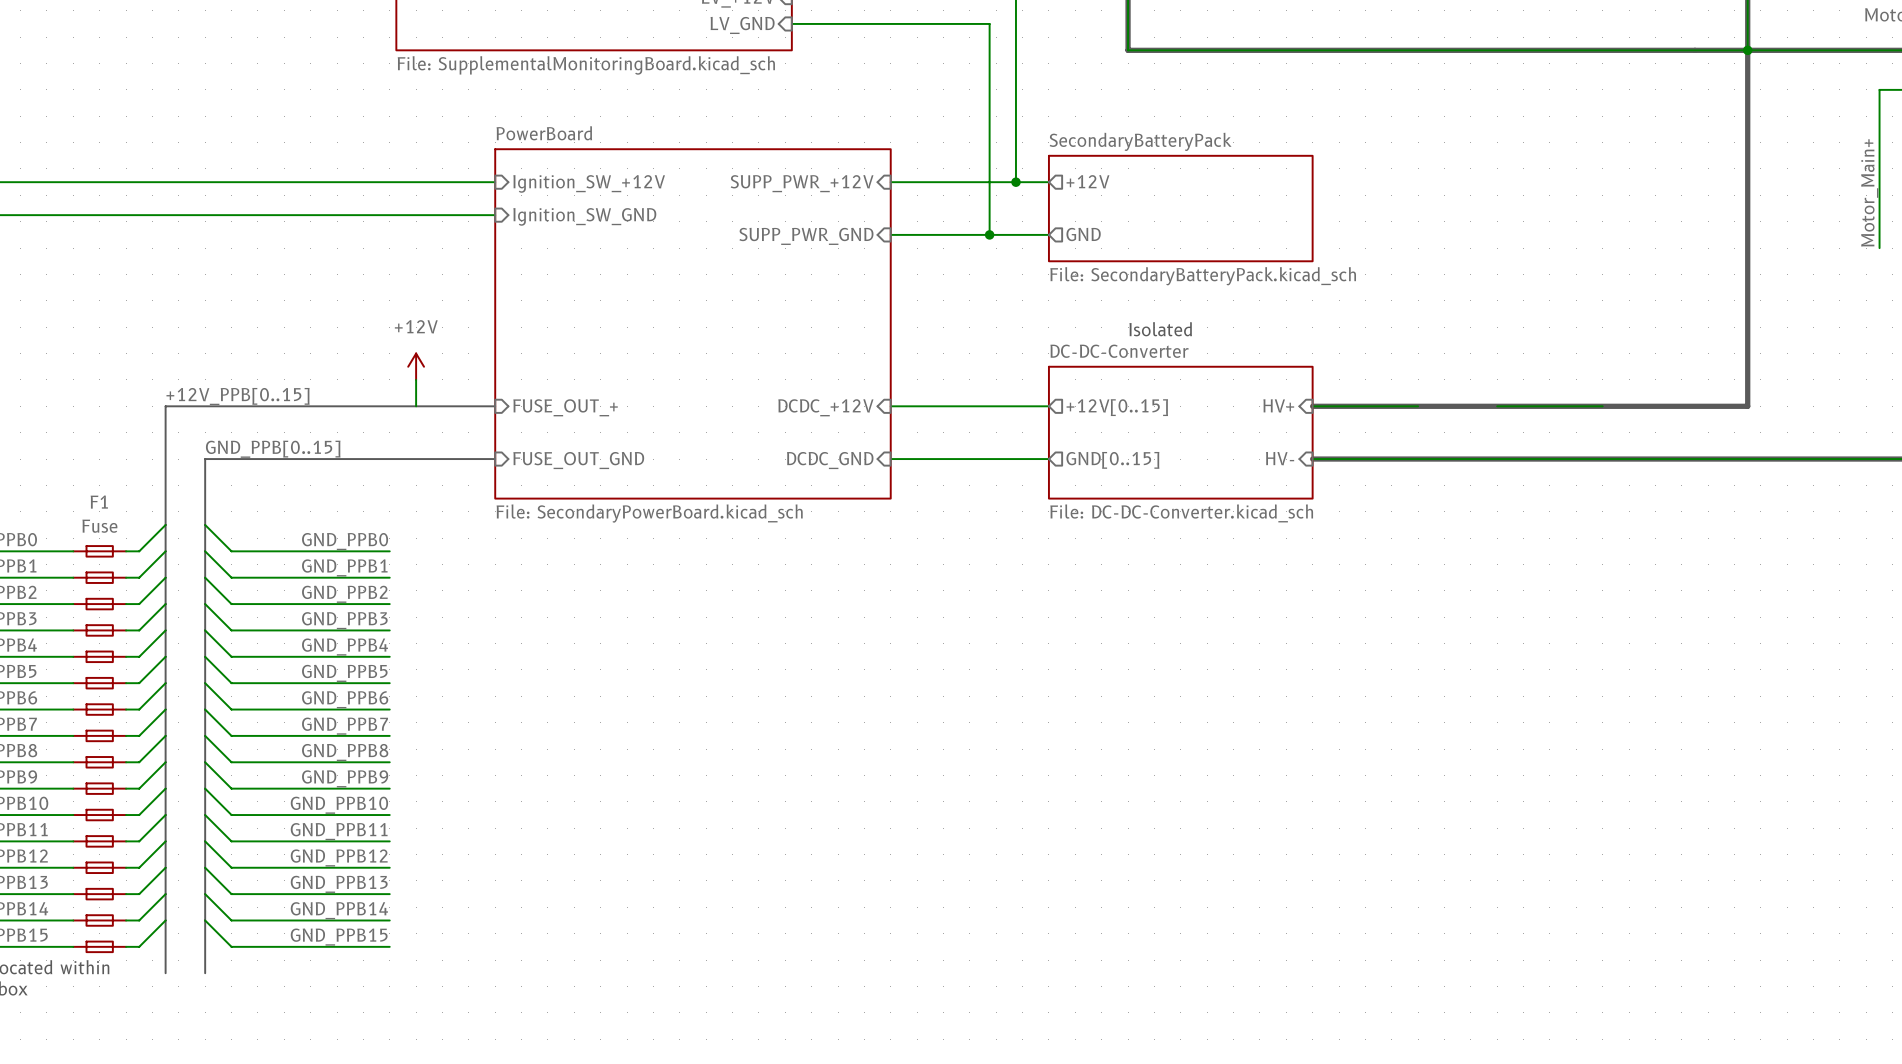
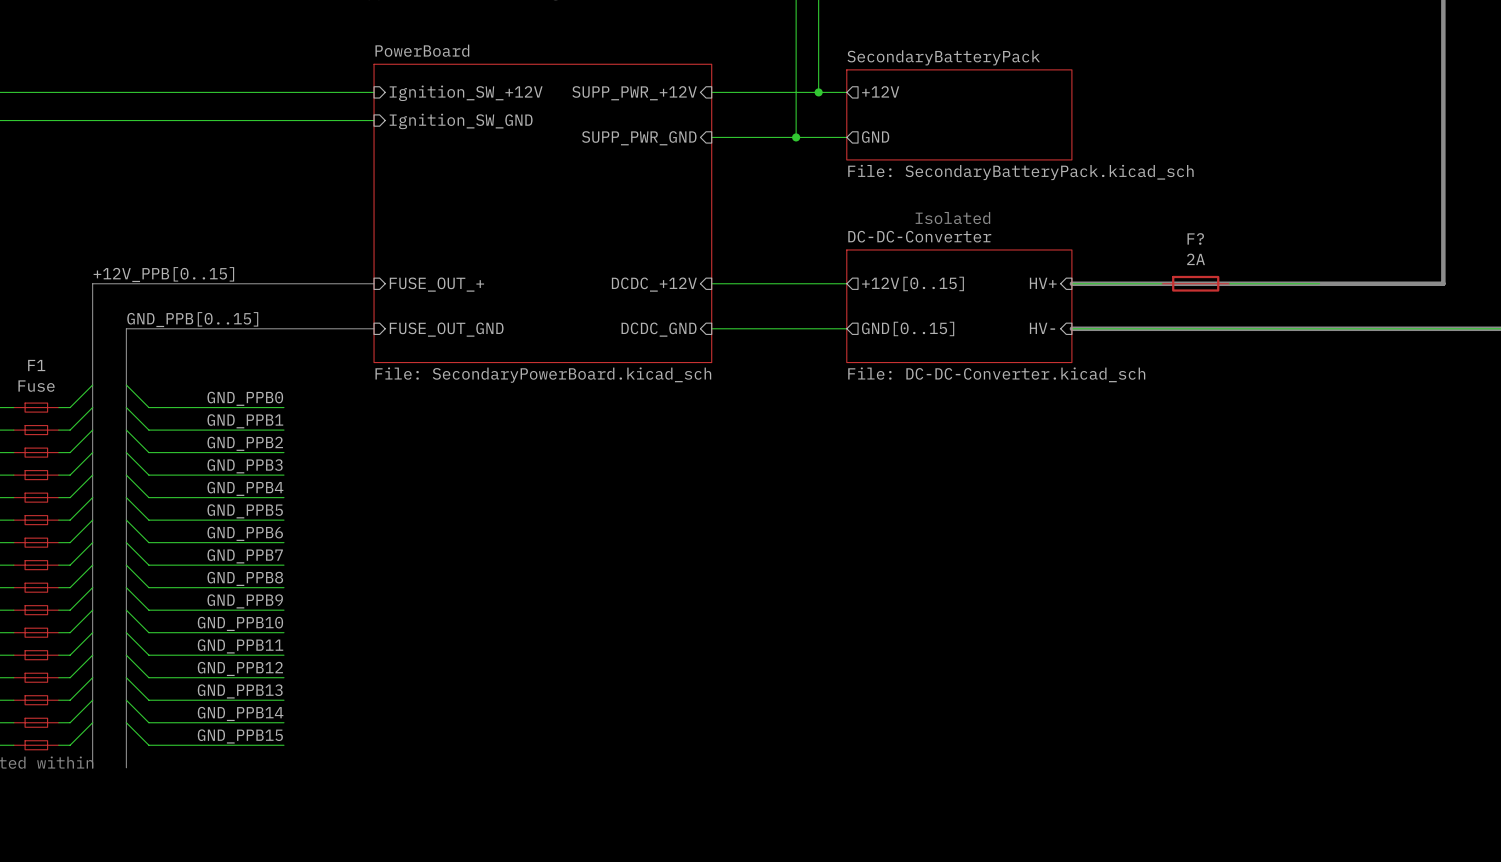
power symbol: +12V (416, 366) -> none
wire: (416, 379) (416, 406) -> none
F?: none -> 2A (1195, 283)

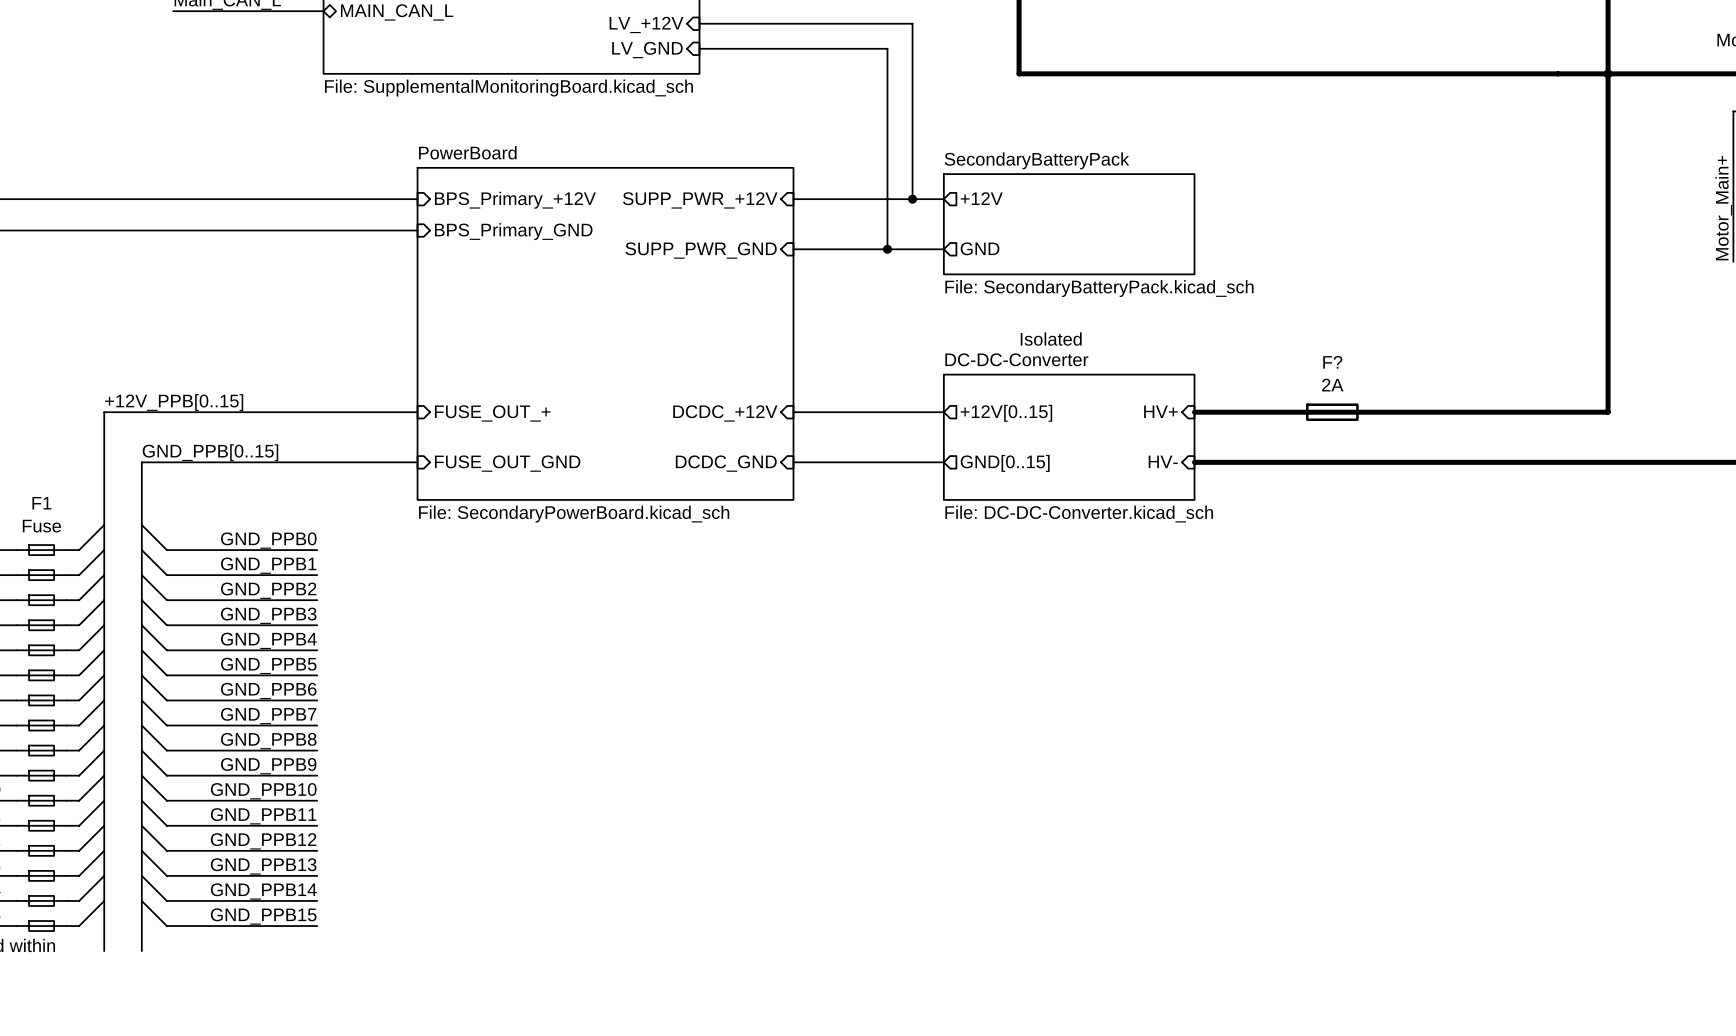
sheet pin: Ignition_SW_+12V (466, 93) -> BPS_Primary_+12V (515, 200)
sheet pin: Ignition_SW_GND (461, 121) -> BPS_Primary_GND (513, 231)

